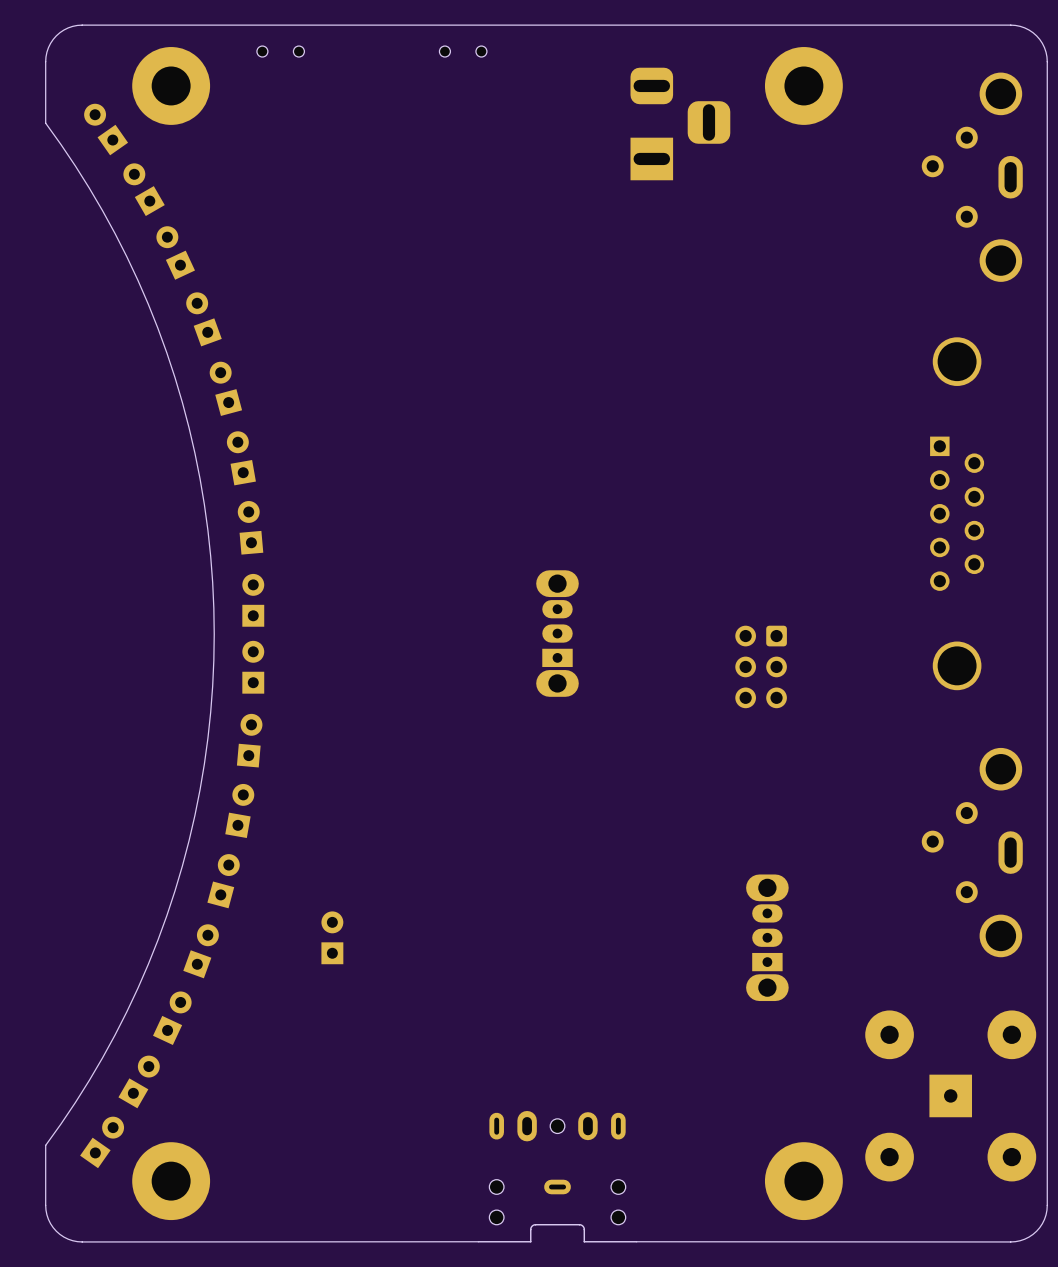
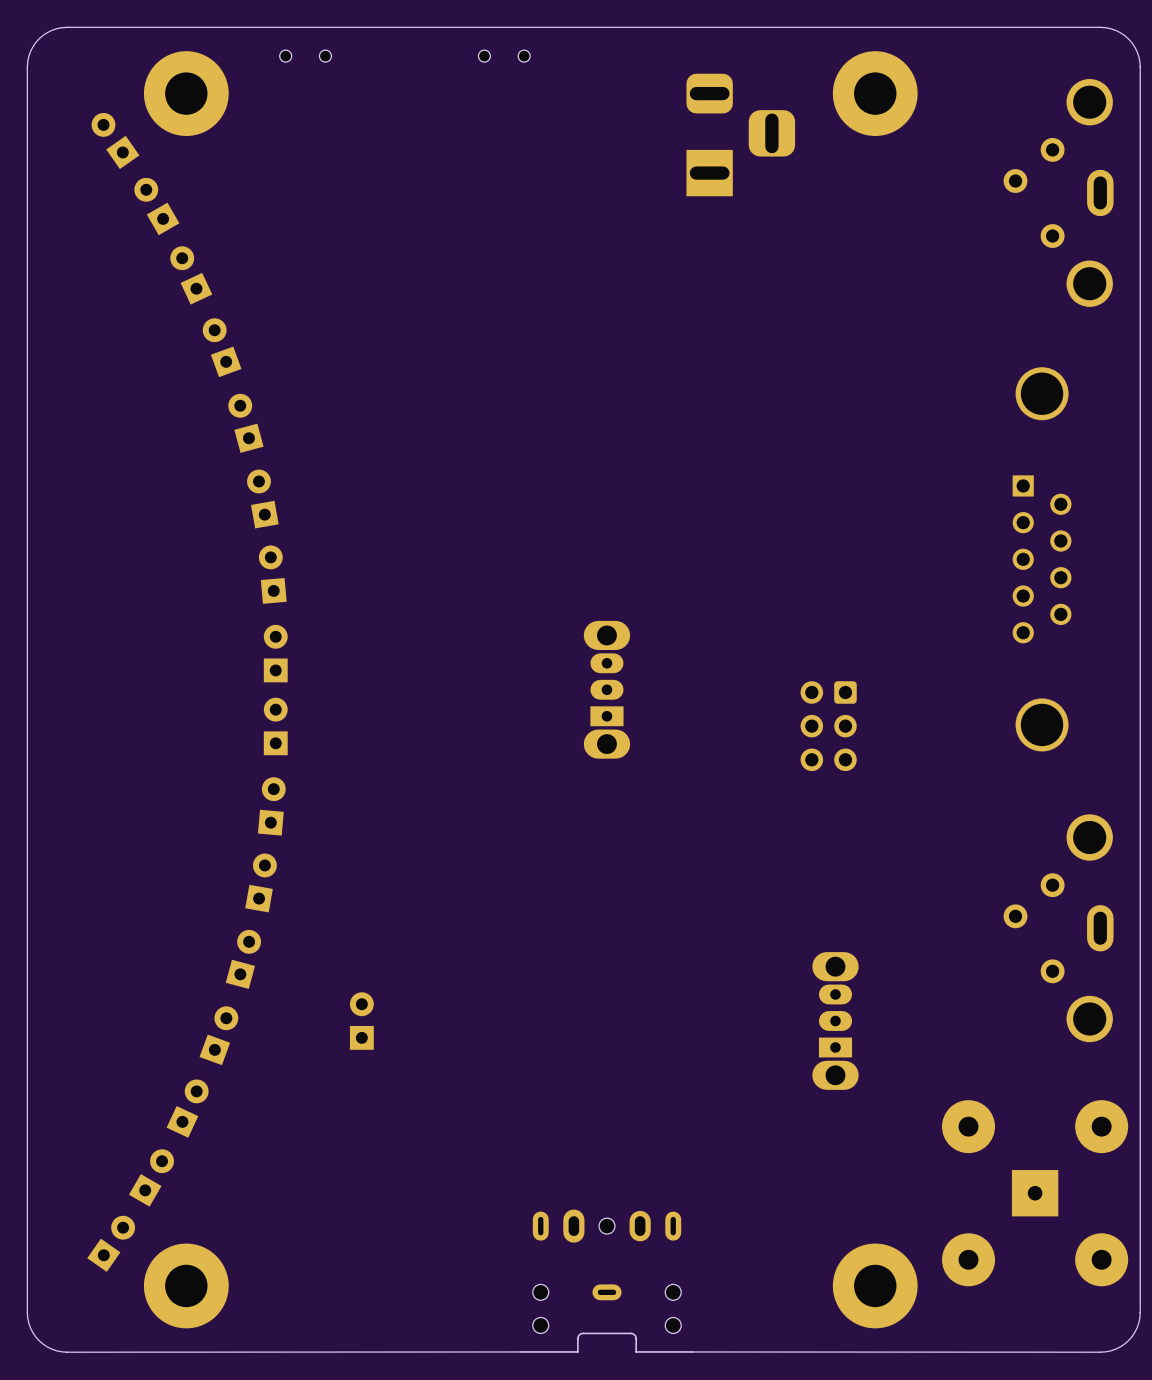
board edge: (82, 25) (72, 26) (59, 32) (48, 47) (45, 61) (45, 123) (89, 188) (114, 233) (148, 304) (175, 377) (194, 453) (204, 504) (212, 582) (213, 660) (210, 712) (200, 789) (189, 840) (175, 890) (148, 964) (126, 1011) (89, 1080) (45, 1145) (46, 1214) (50, 1223) (59, 1234) (68, 1239) (82, 1241) (478, 1241) -> (89, 27) (61, 27) (47, 32) (32, 47) (27, 67) (28, 1322) (32, 1332) (42, 1343) (56, 1350) (67, 1352) (520, 1351)

